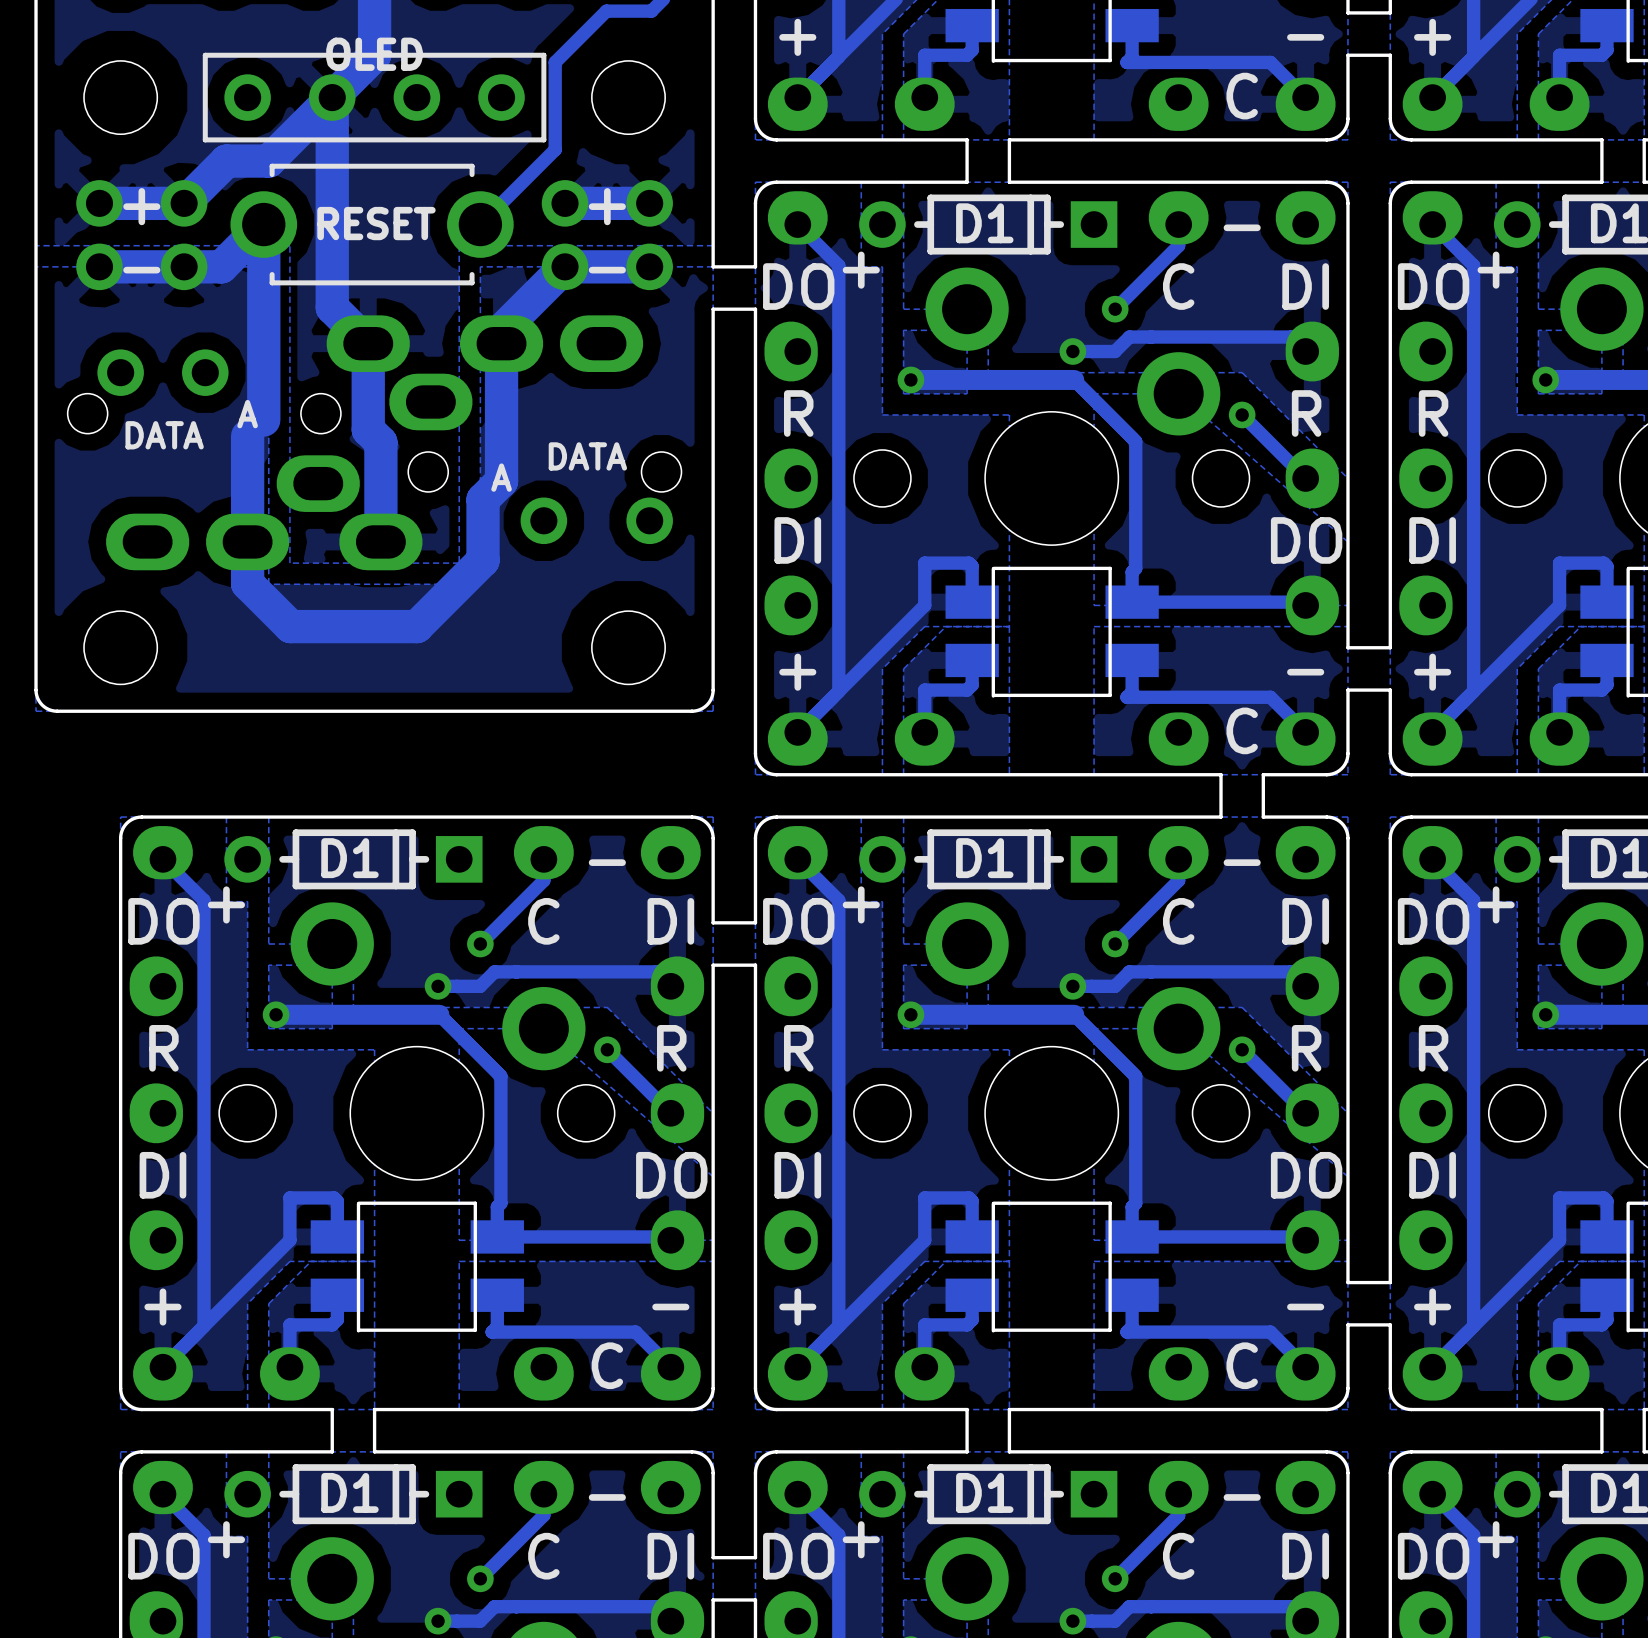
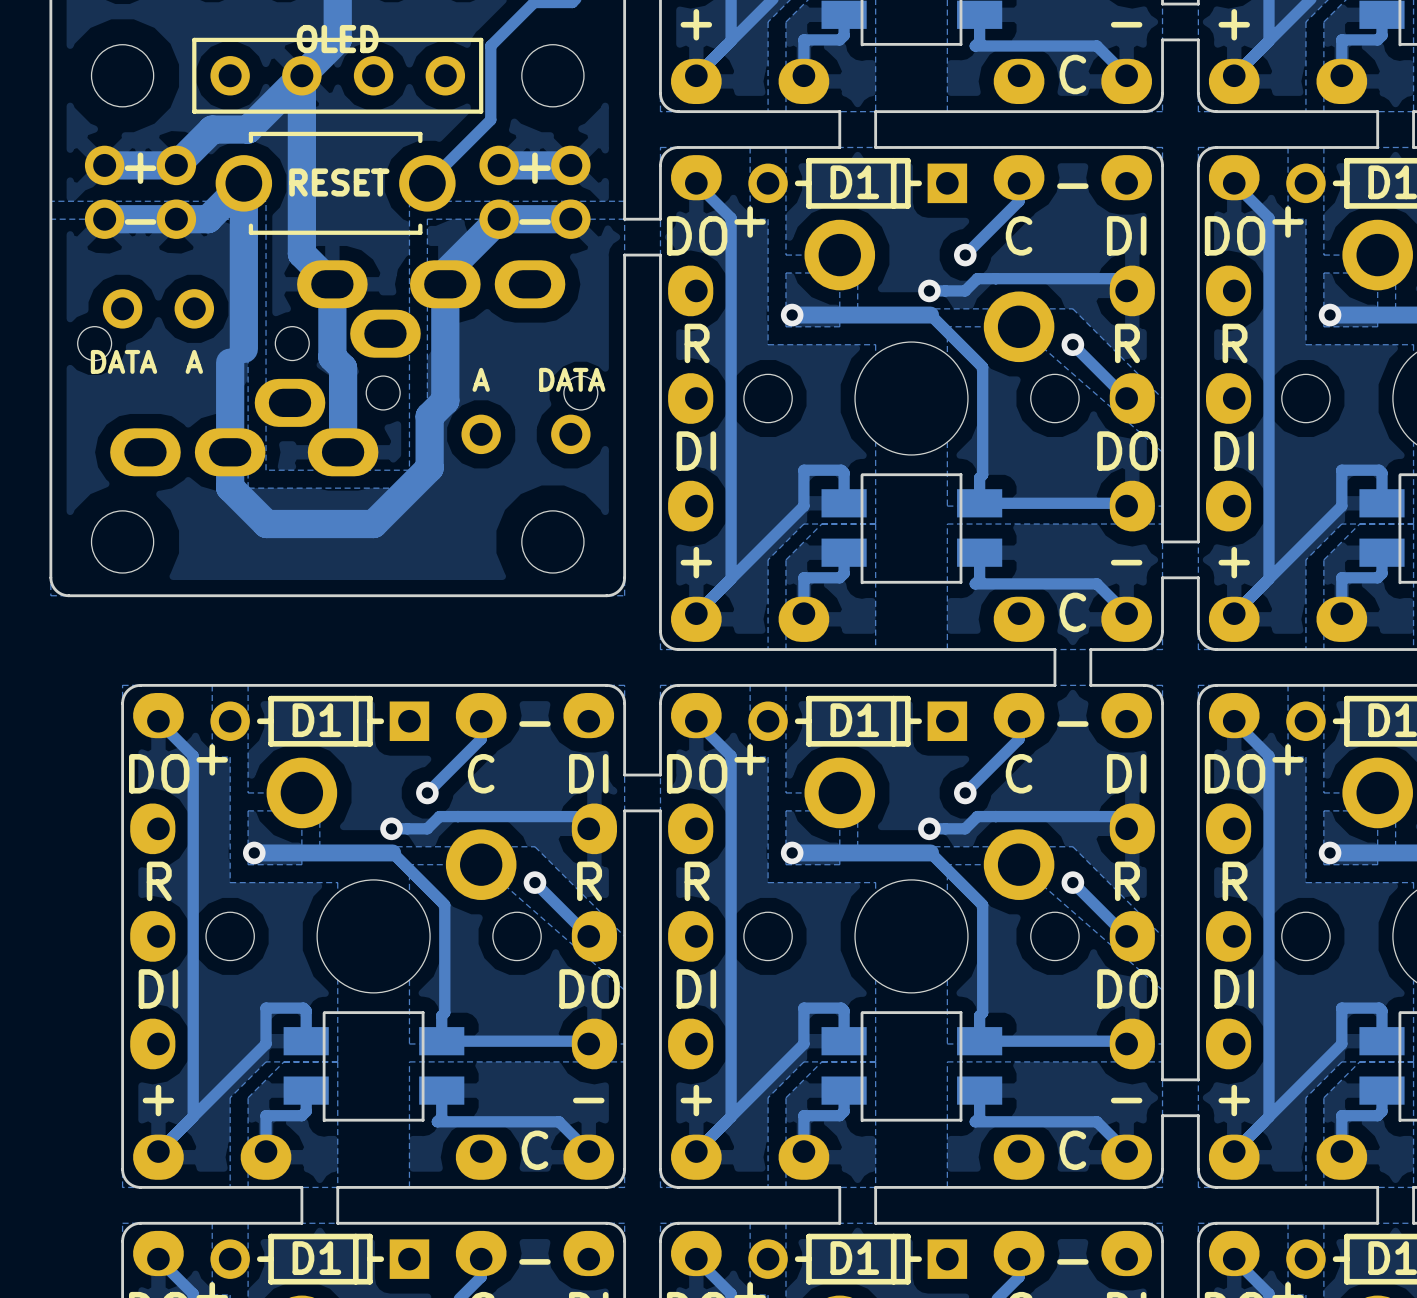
A name position: A (247, 414) -> A (194, 361)
DATA name position: DATA (164, 435) -> DATA (123, 361)
DATA name position: DATA (587, 456) -> DATA (572, 379)
A name position: A (501, 477) -> A (481, 379)

